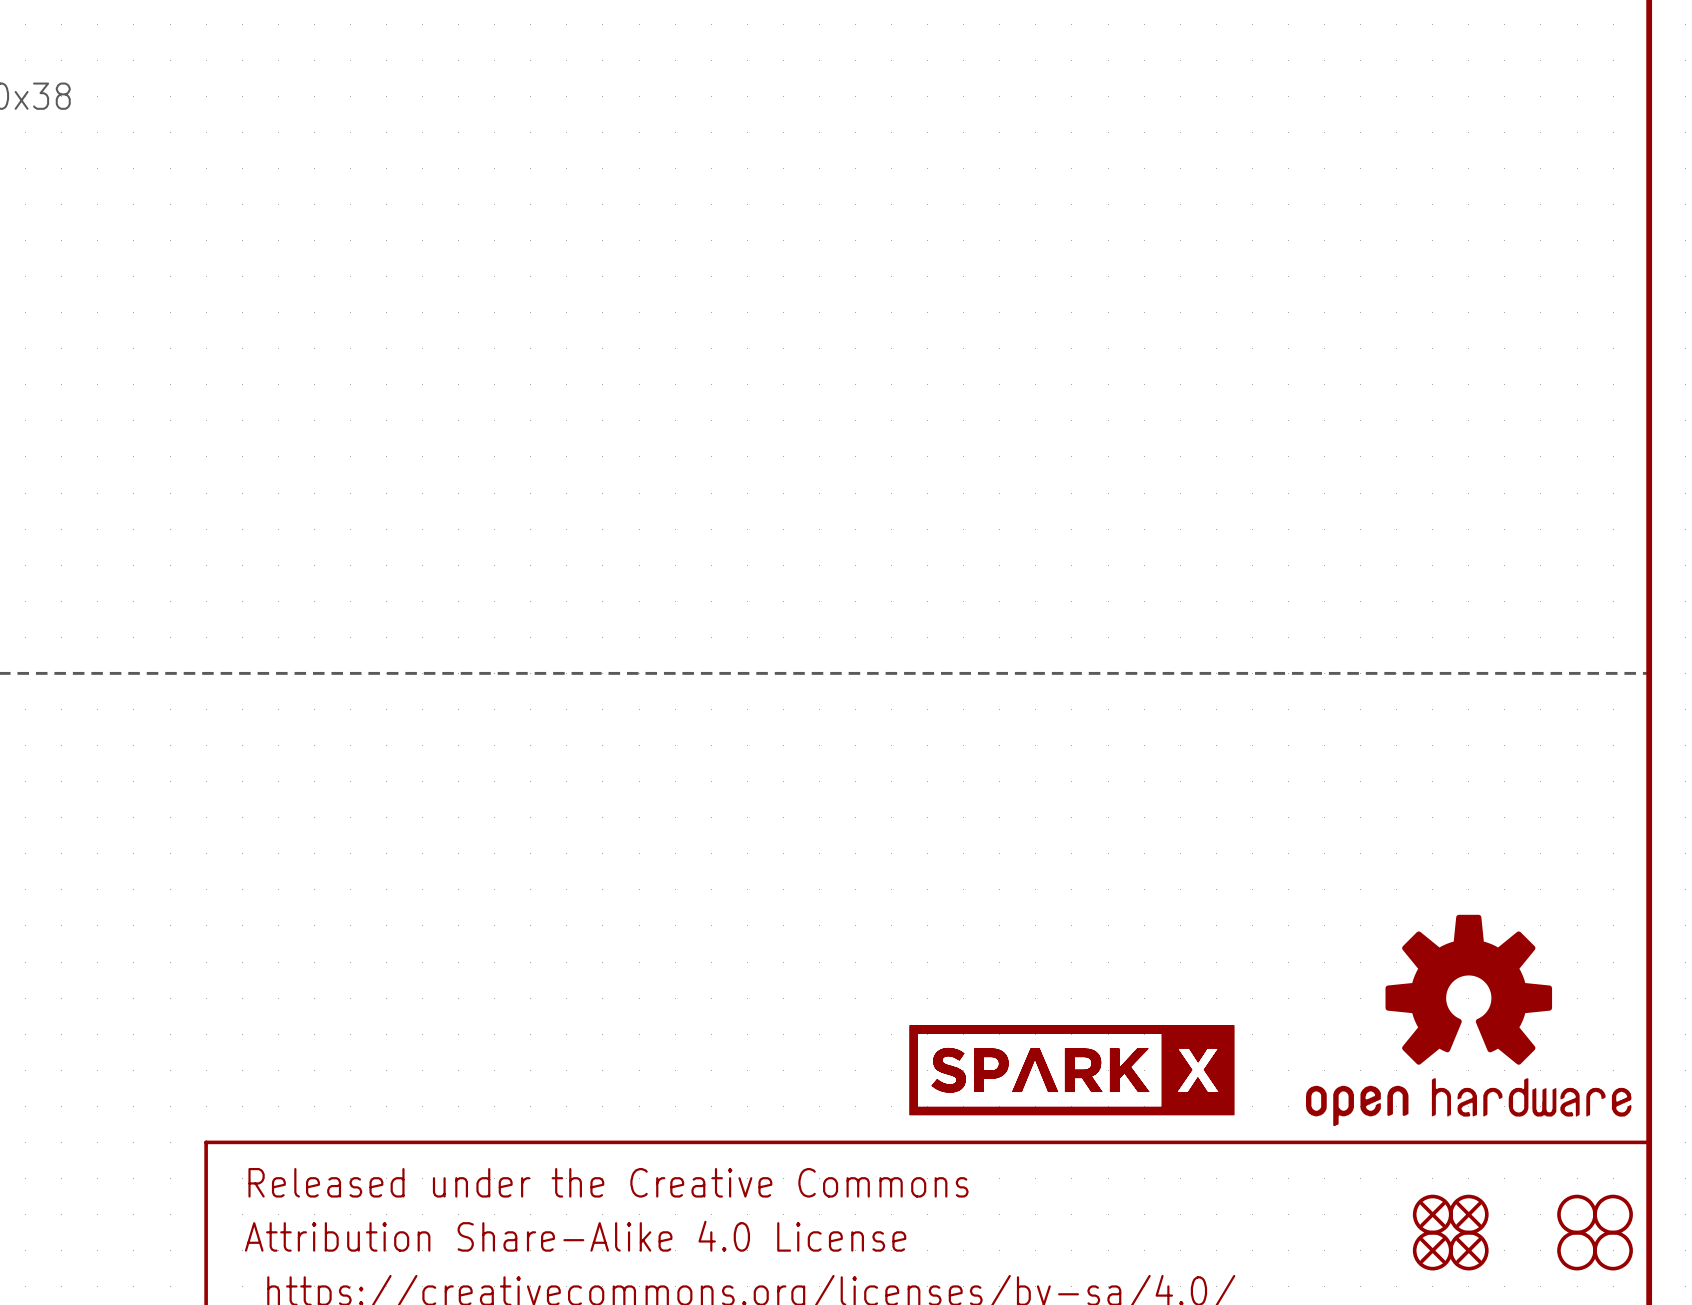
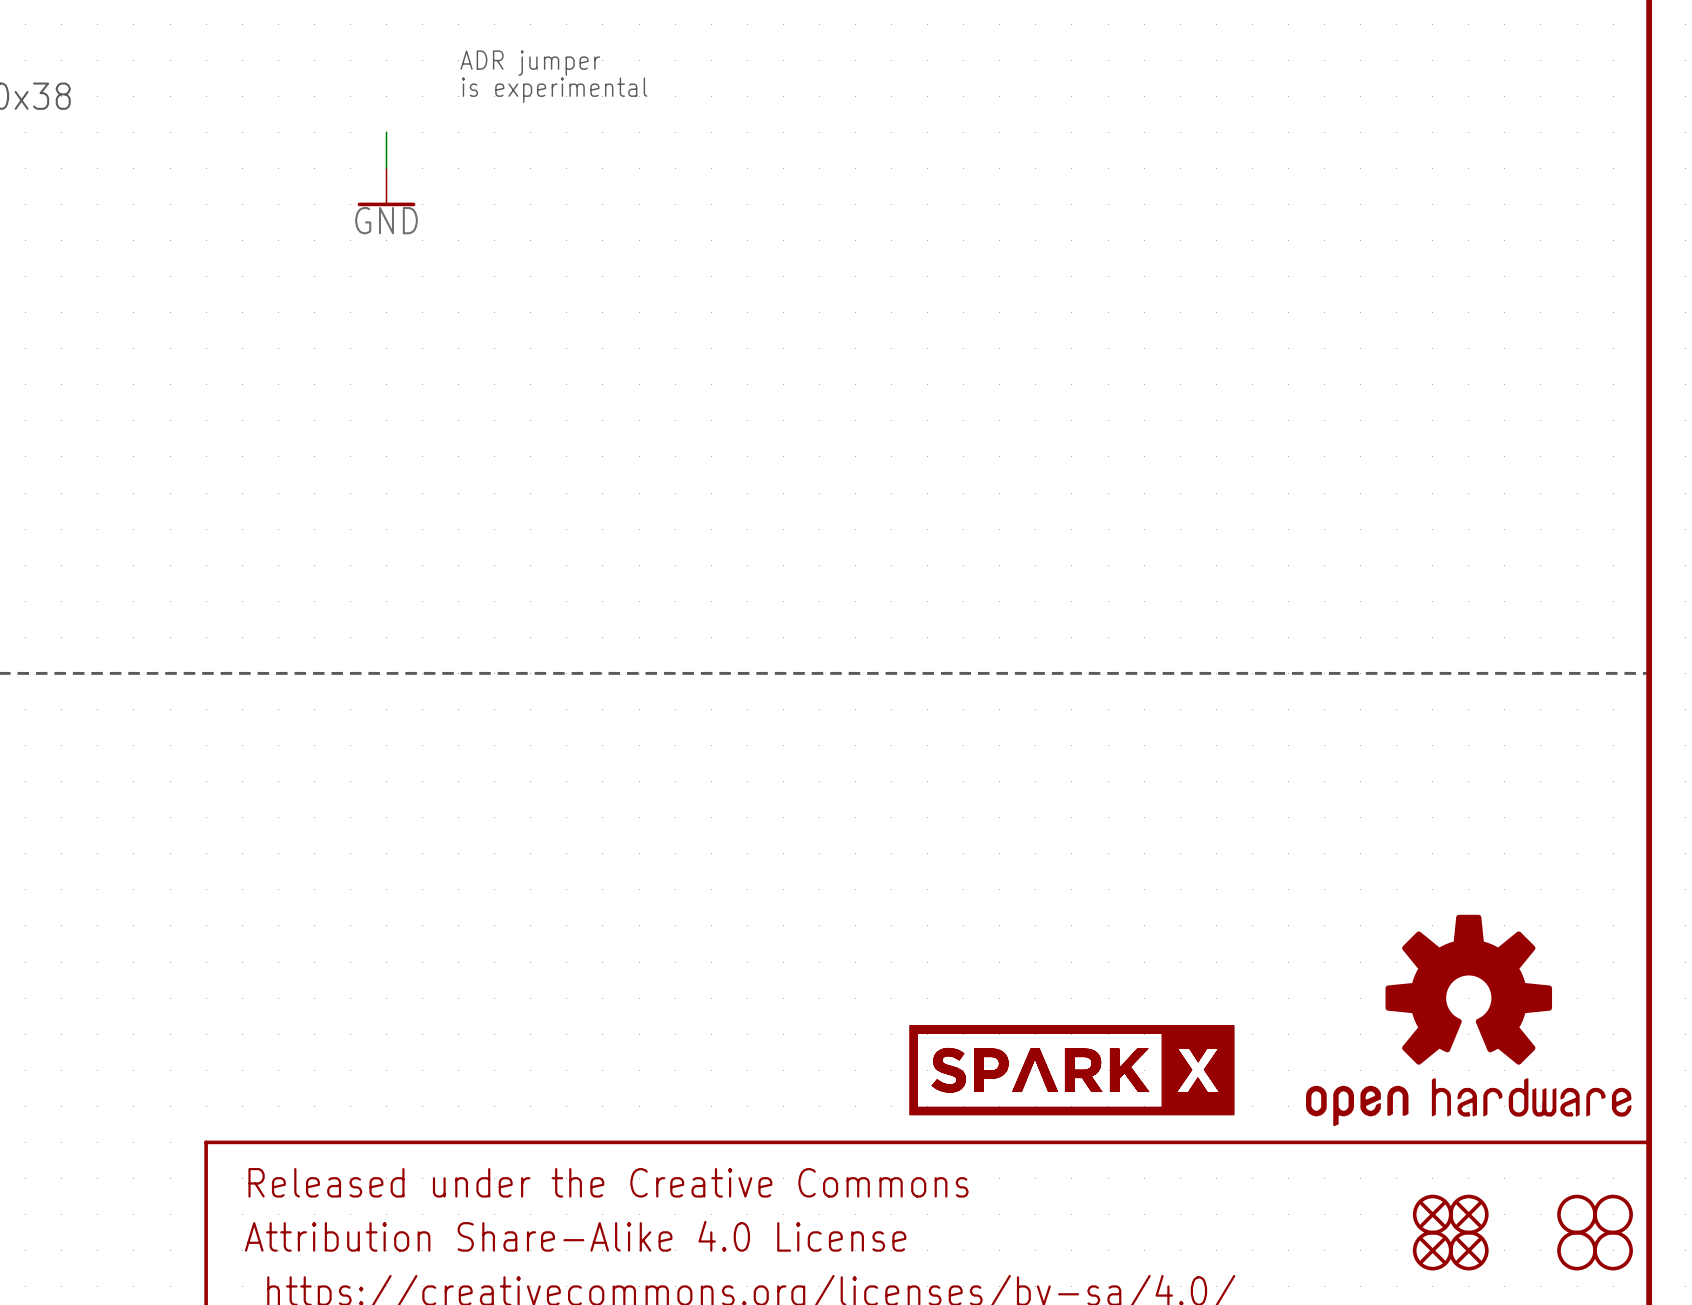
text: none -> ADR jumper (530, 63)
text: none -> is experimental (554, 90)
wire: none -> (386, 132) (386, 168)
power symbol: none -> GND (386, 187)

